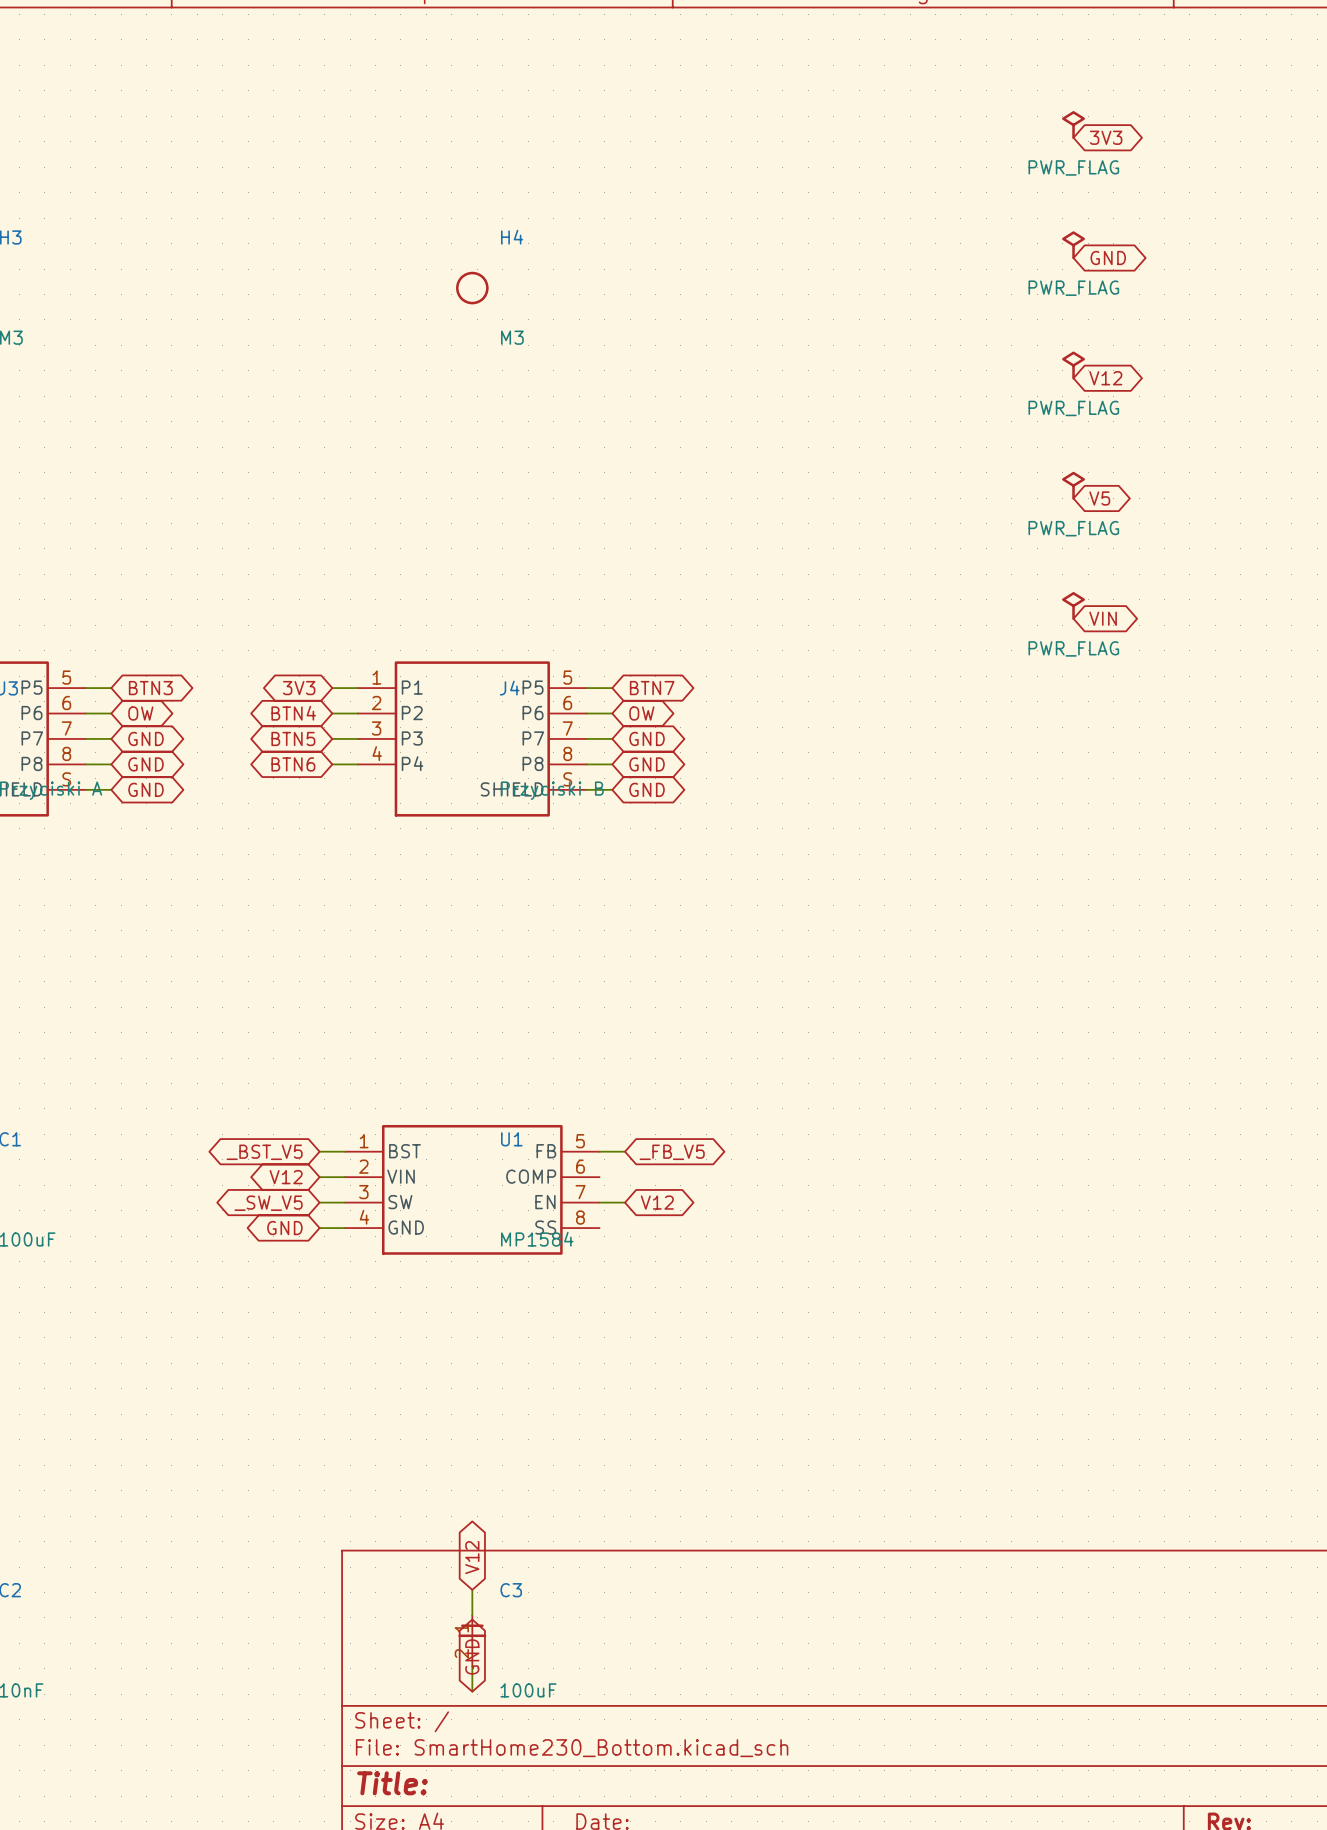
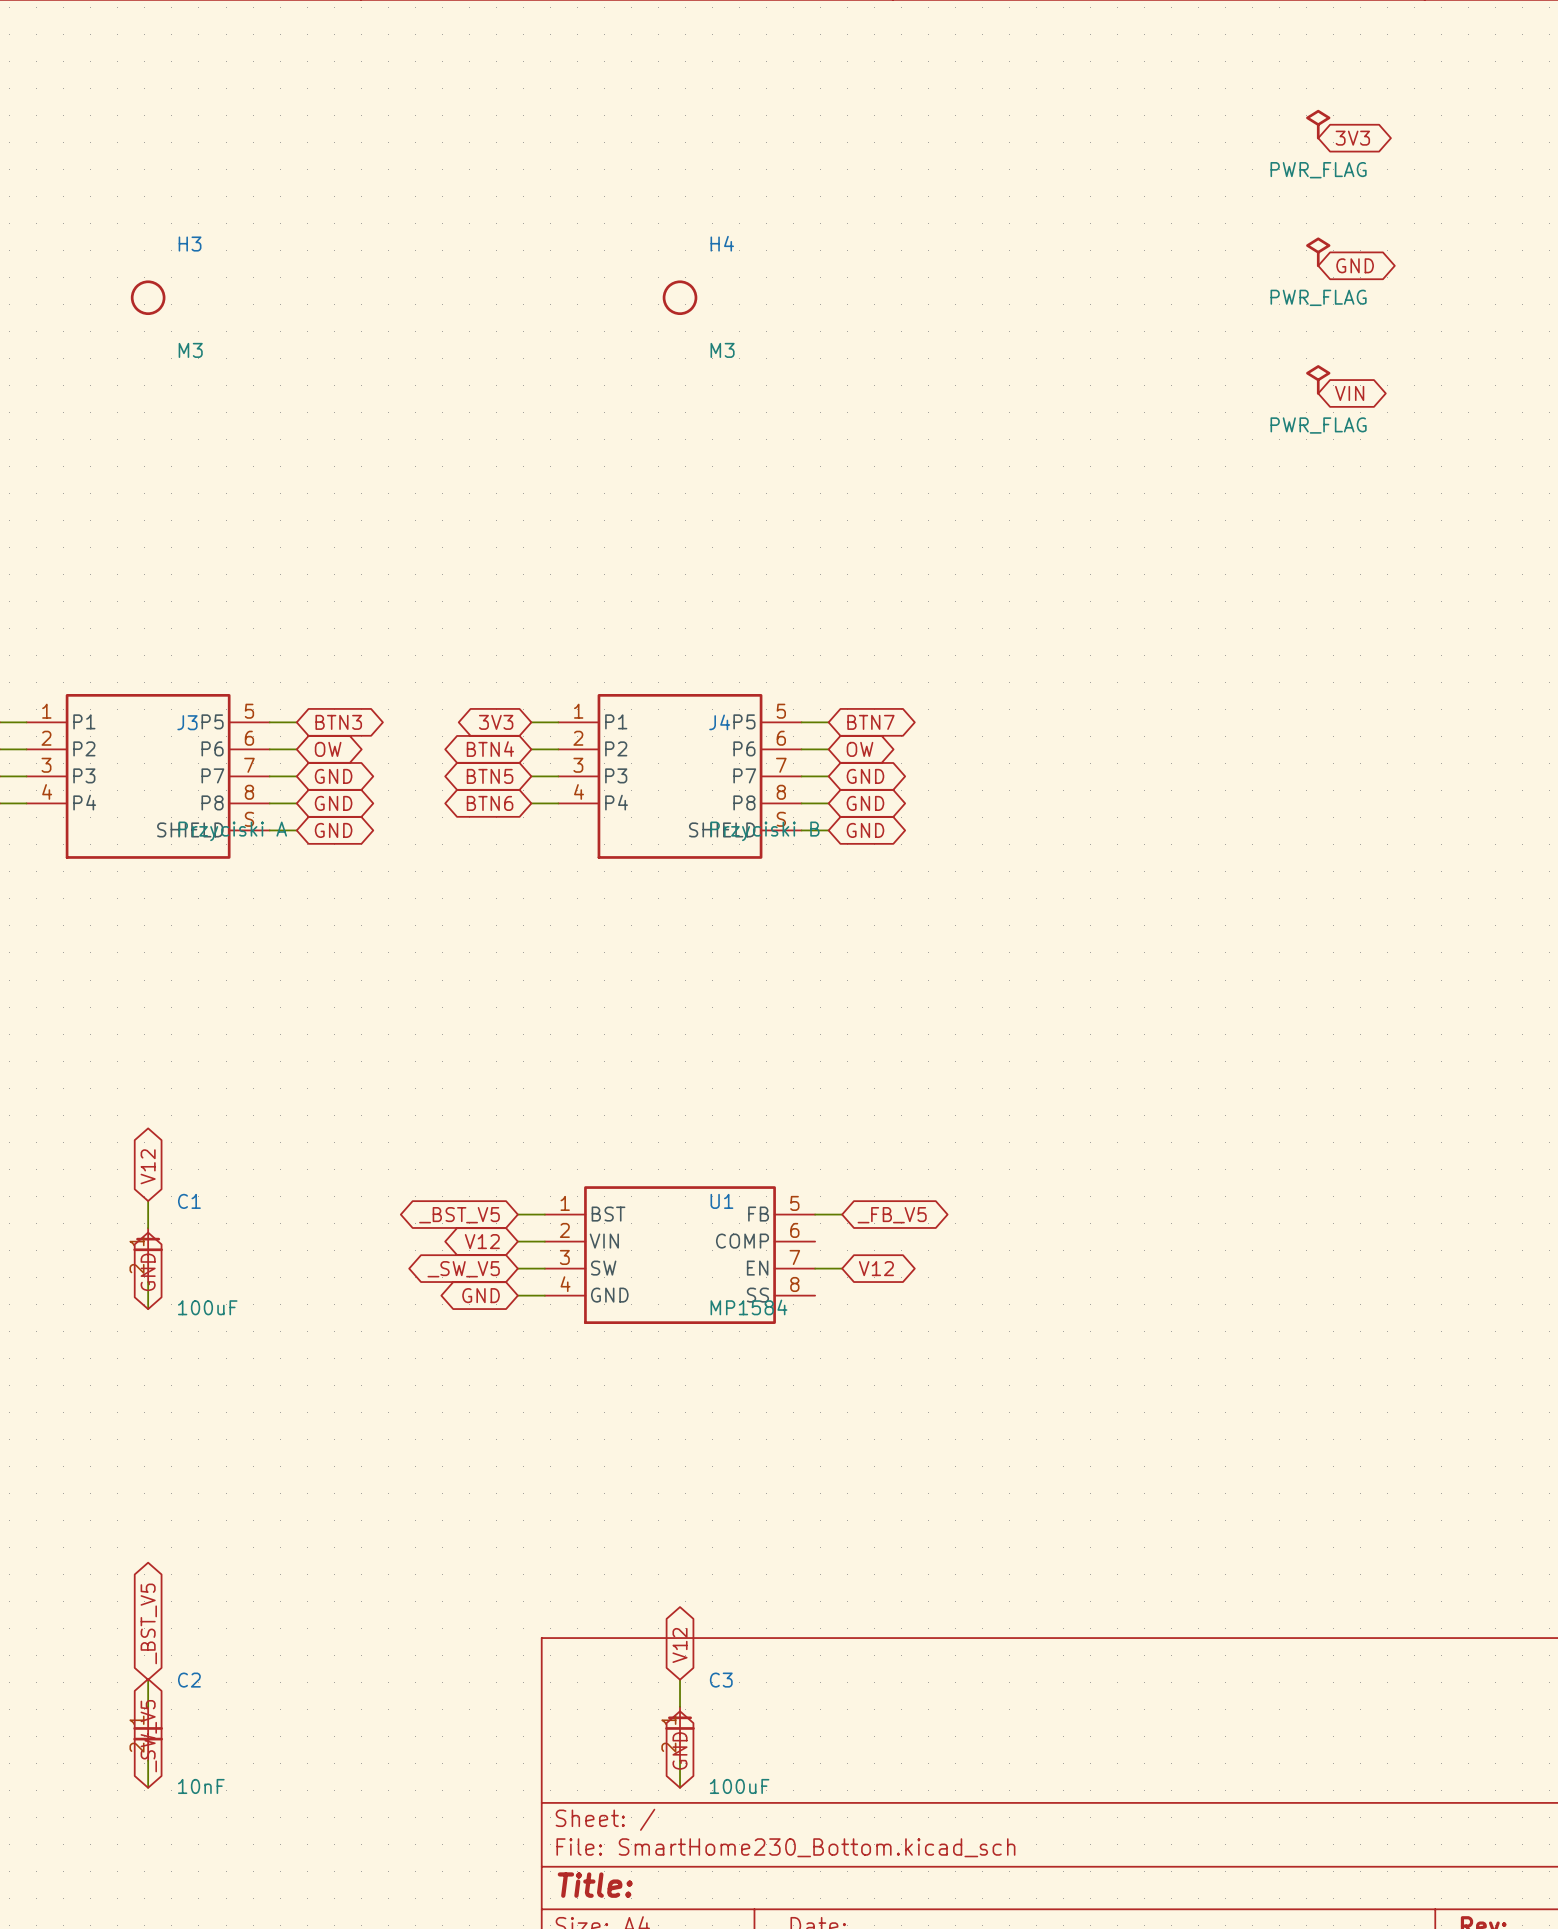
global label: V12 (1105, 378) -> VIN (1349, 393)
power symbol: PWR_FLAG (1073, 485) -> none
global label: V5 (1099, 498) -> none
power symbol: PWR_FLAG (1073, 606) -> none
global label: VIN (1103, 618) -> none

